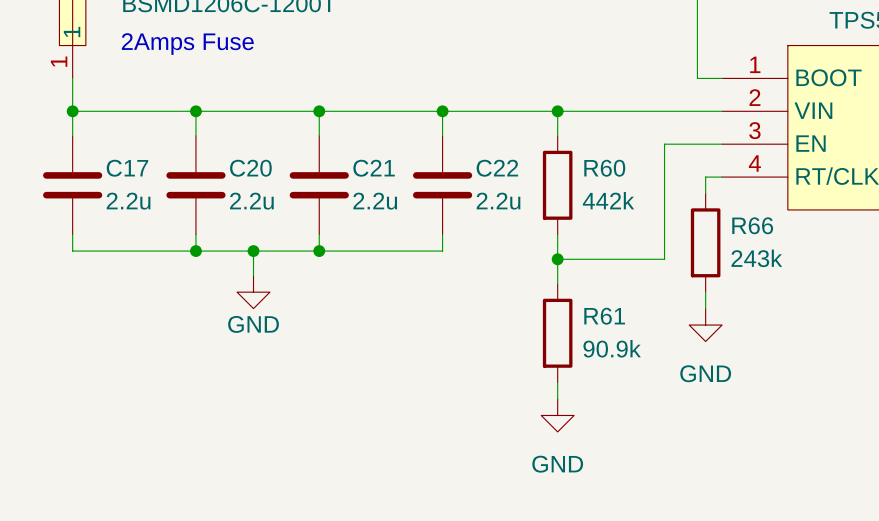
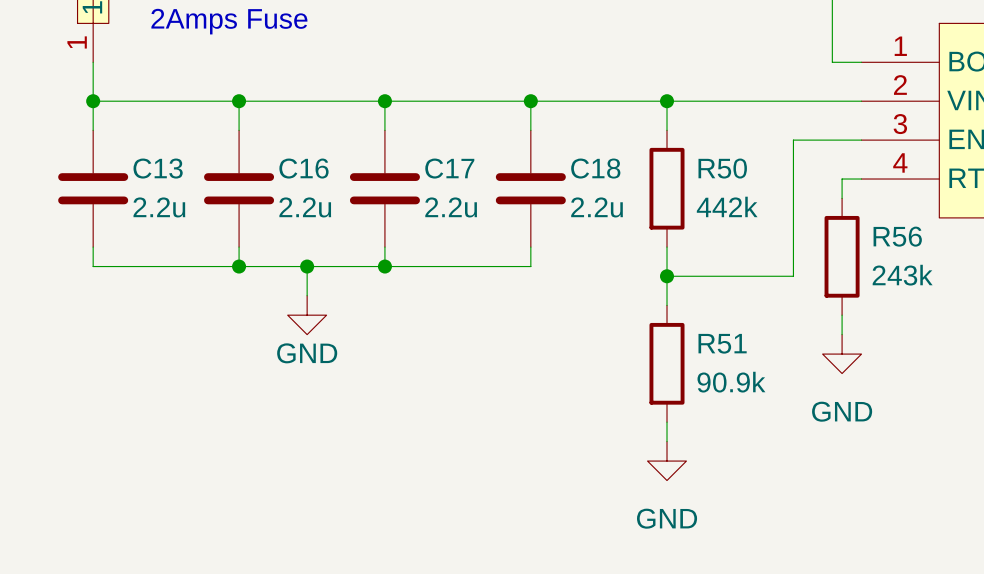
C17 name: C17 (127, 168) -> C13 (158, 168)
C20 name: C20 (250, 168) -> C16 (303, 168)
C21 name: C21 (374, 168) -> C17 (449, 168)
C22 name: C22 (497, 168) -> C18 (595, 168)
R60 name: R60 (604, 168) -> R50 (722, 168)
R66 name: R66 (752, 225) -> R56 (897, 236)
R61 name: R61 (604, 316) -> R51 (722, 343)

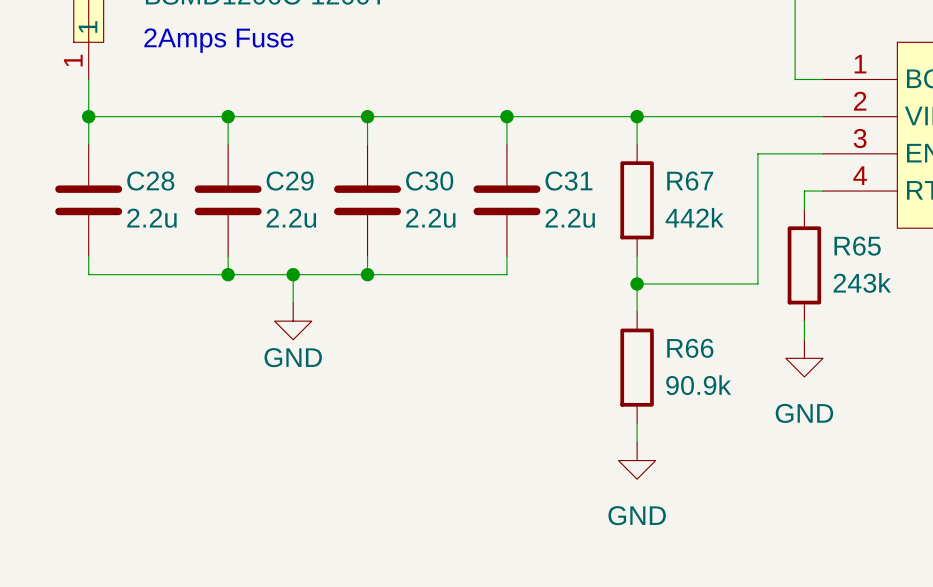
C13 name: C13 (158, 168) -> C28 (150, 181)
C16 name: C16 (303, 168) -> C29 (290, 181)
C17 name: C17 (449, 168) -> C30 (429, 181)
C18 name: C18 (595, 168) -> C31 (568, 181)
R50 name: R50 (722, 168) -> R67 (690, 181)
R56 name: R56 (897, 236) -> R65 (857, 246)
R51 name: R51 (722, 343) -> R66 (690, 348)

